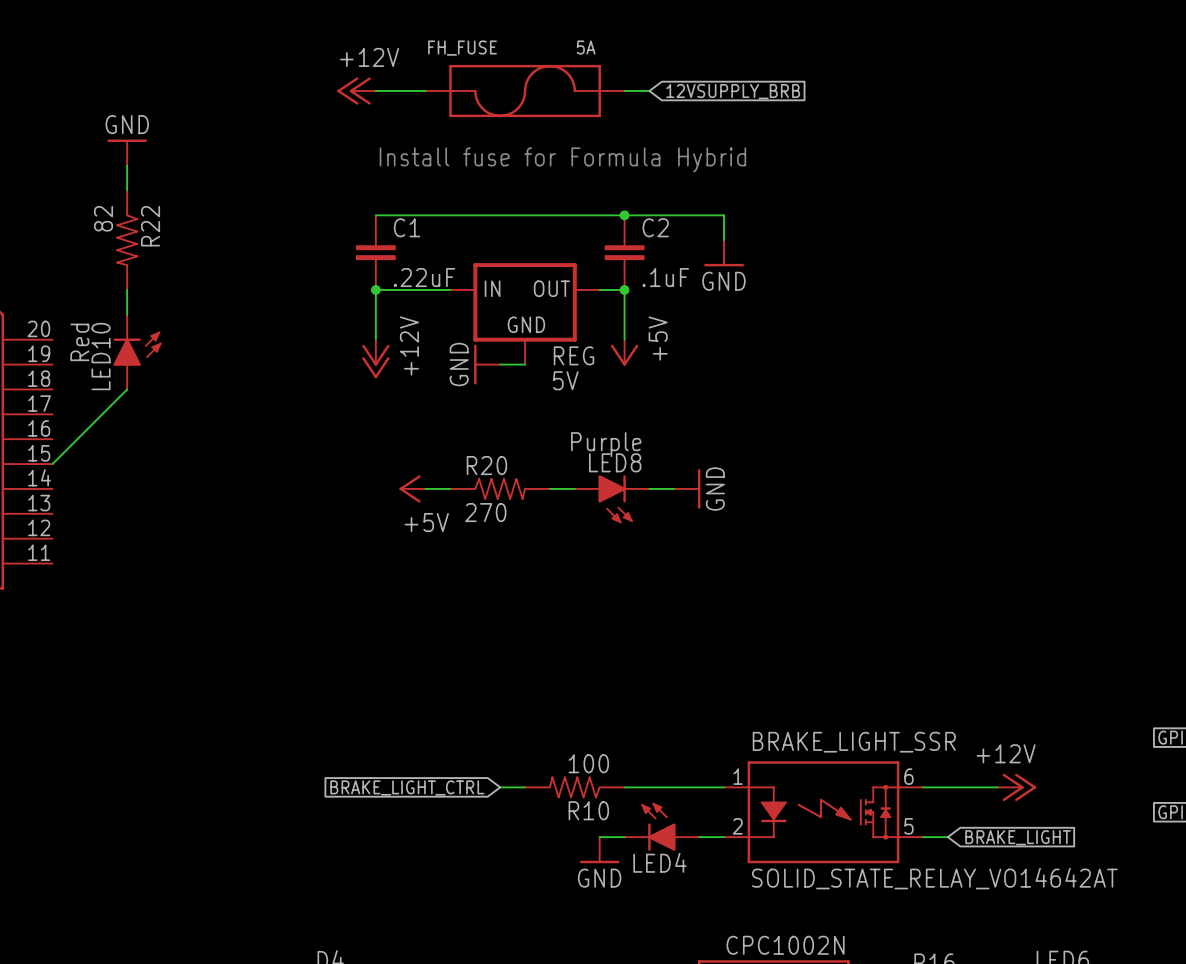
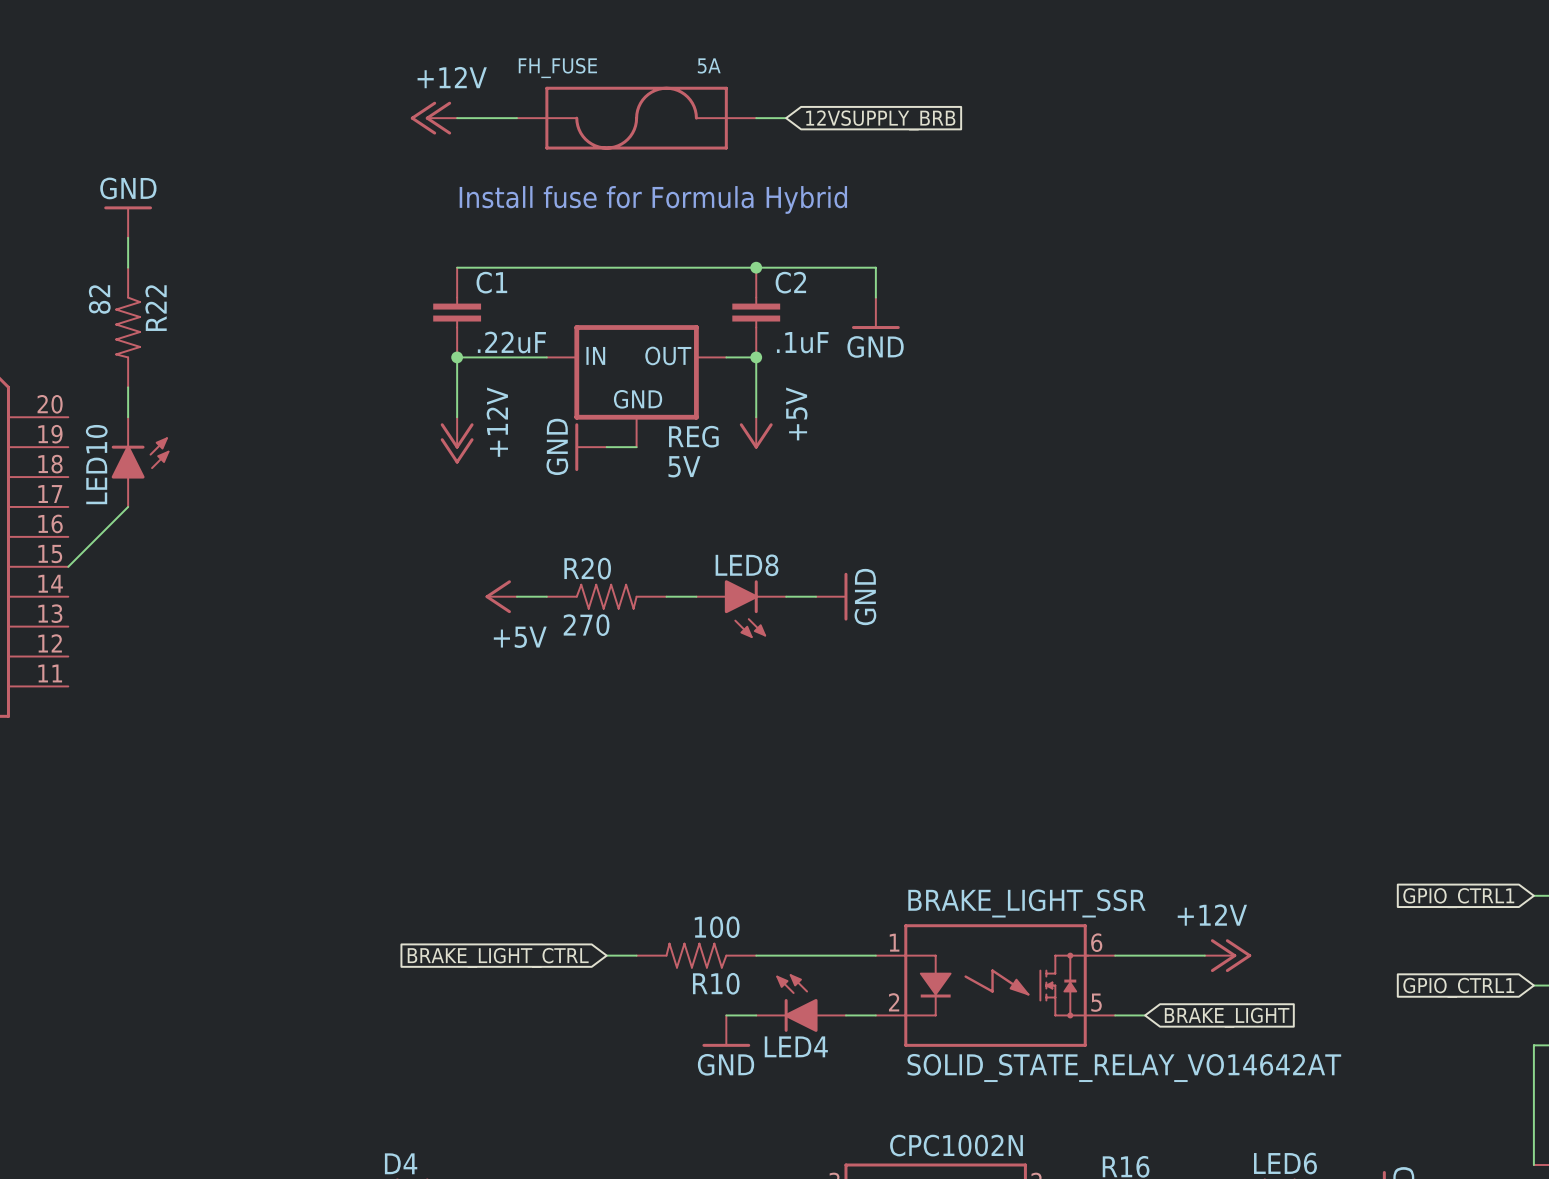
power symbol position: GND (127, 152) -> GND (128, 222)
wire: (127, 165) (127, 190) -> (128, 237) (128, 267)
R22 position: (127, 240) -> (128, 327)
wire: (127, 289) (127, 314) -> (128, 387) (128, 417)
LED10 value: Red (79, 342) -> none
LED10 position: (137, 352) -> (140, 462)
wire: (127, 389) (102, 414) -> none
LED8 value: Purple (606, 444) -> none

